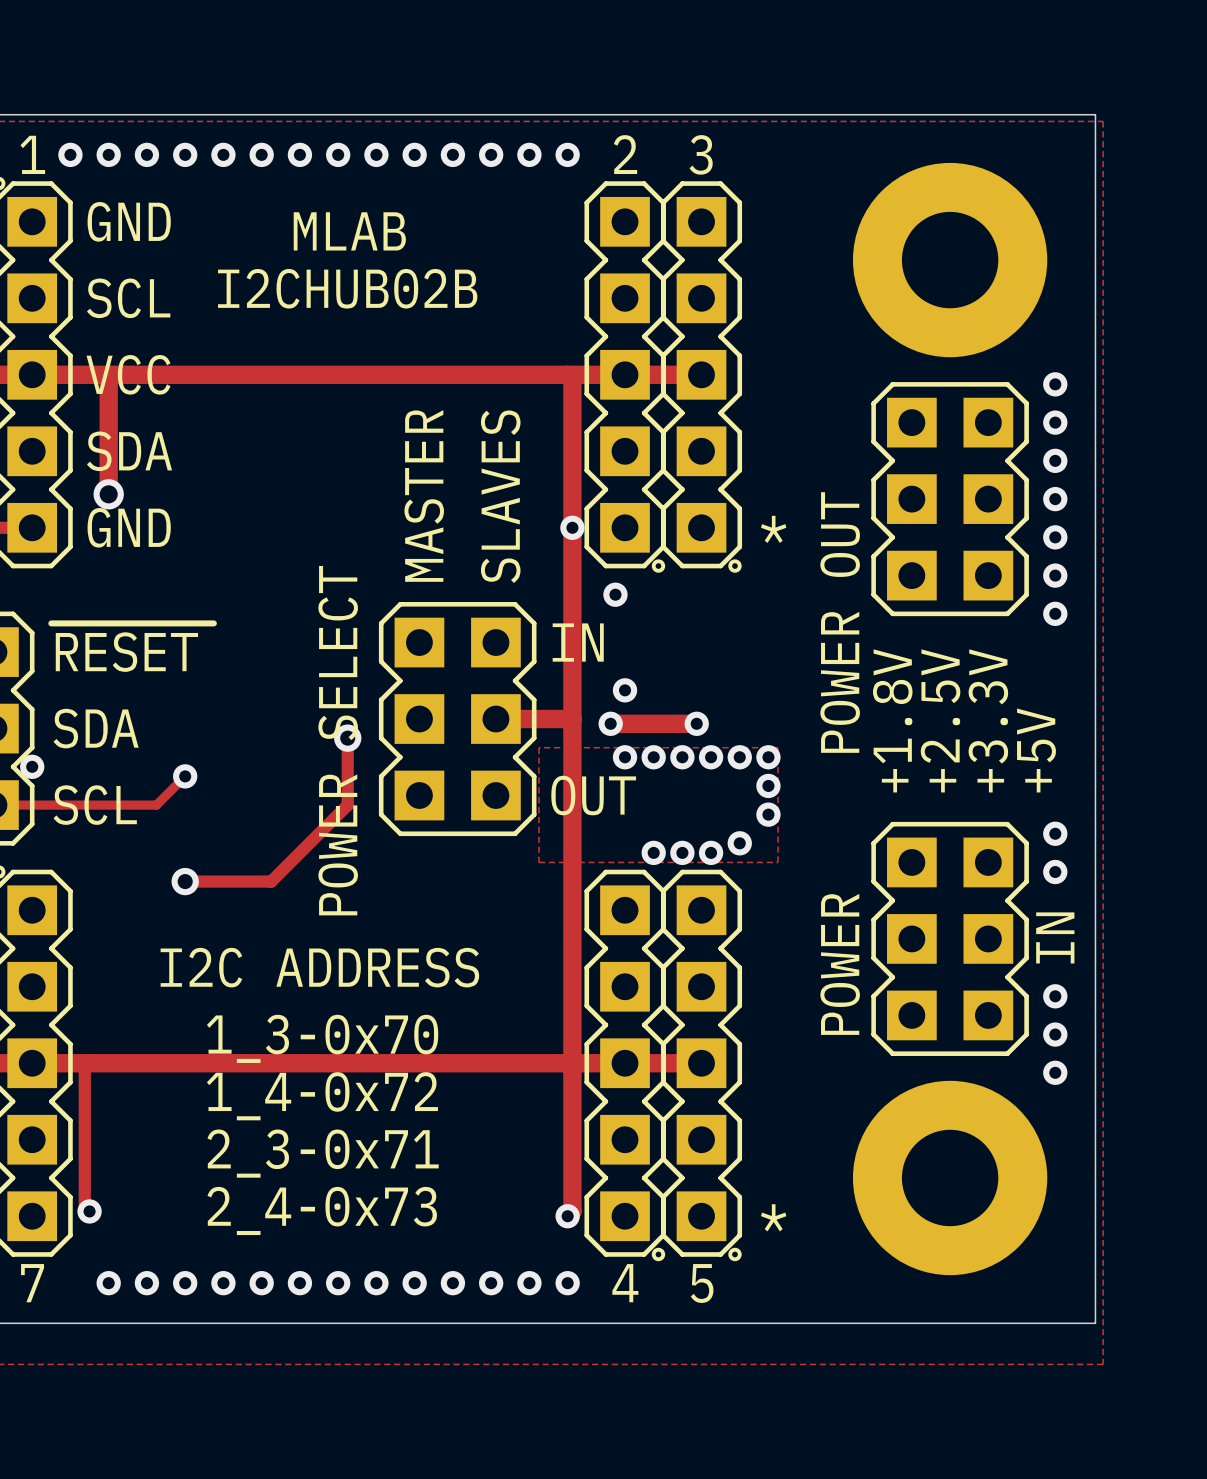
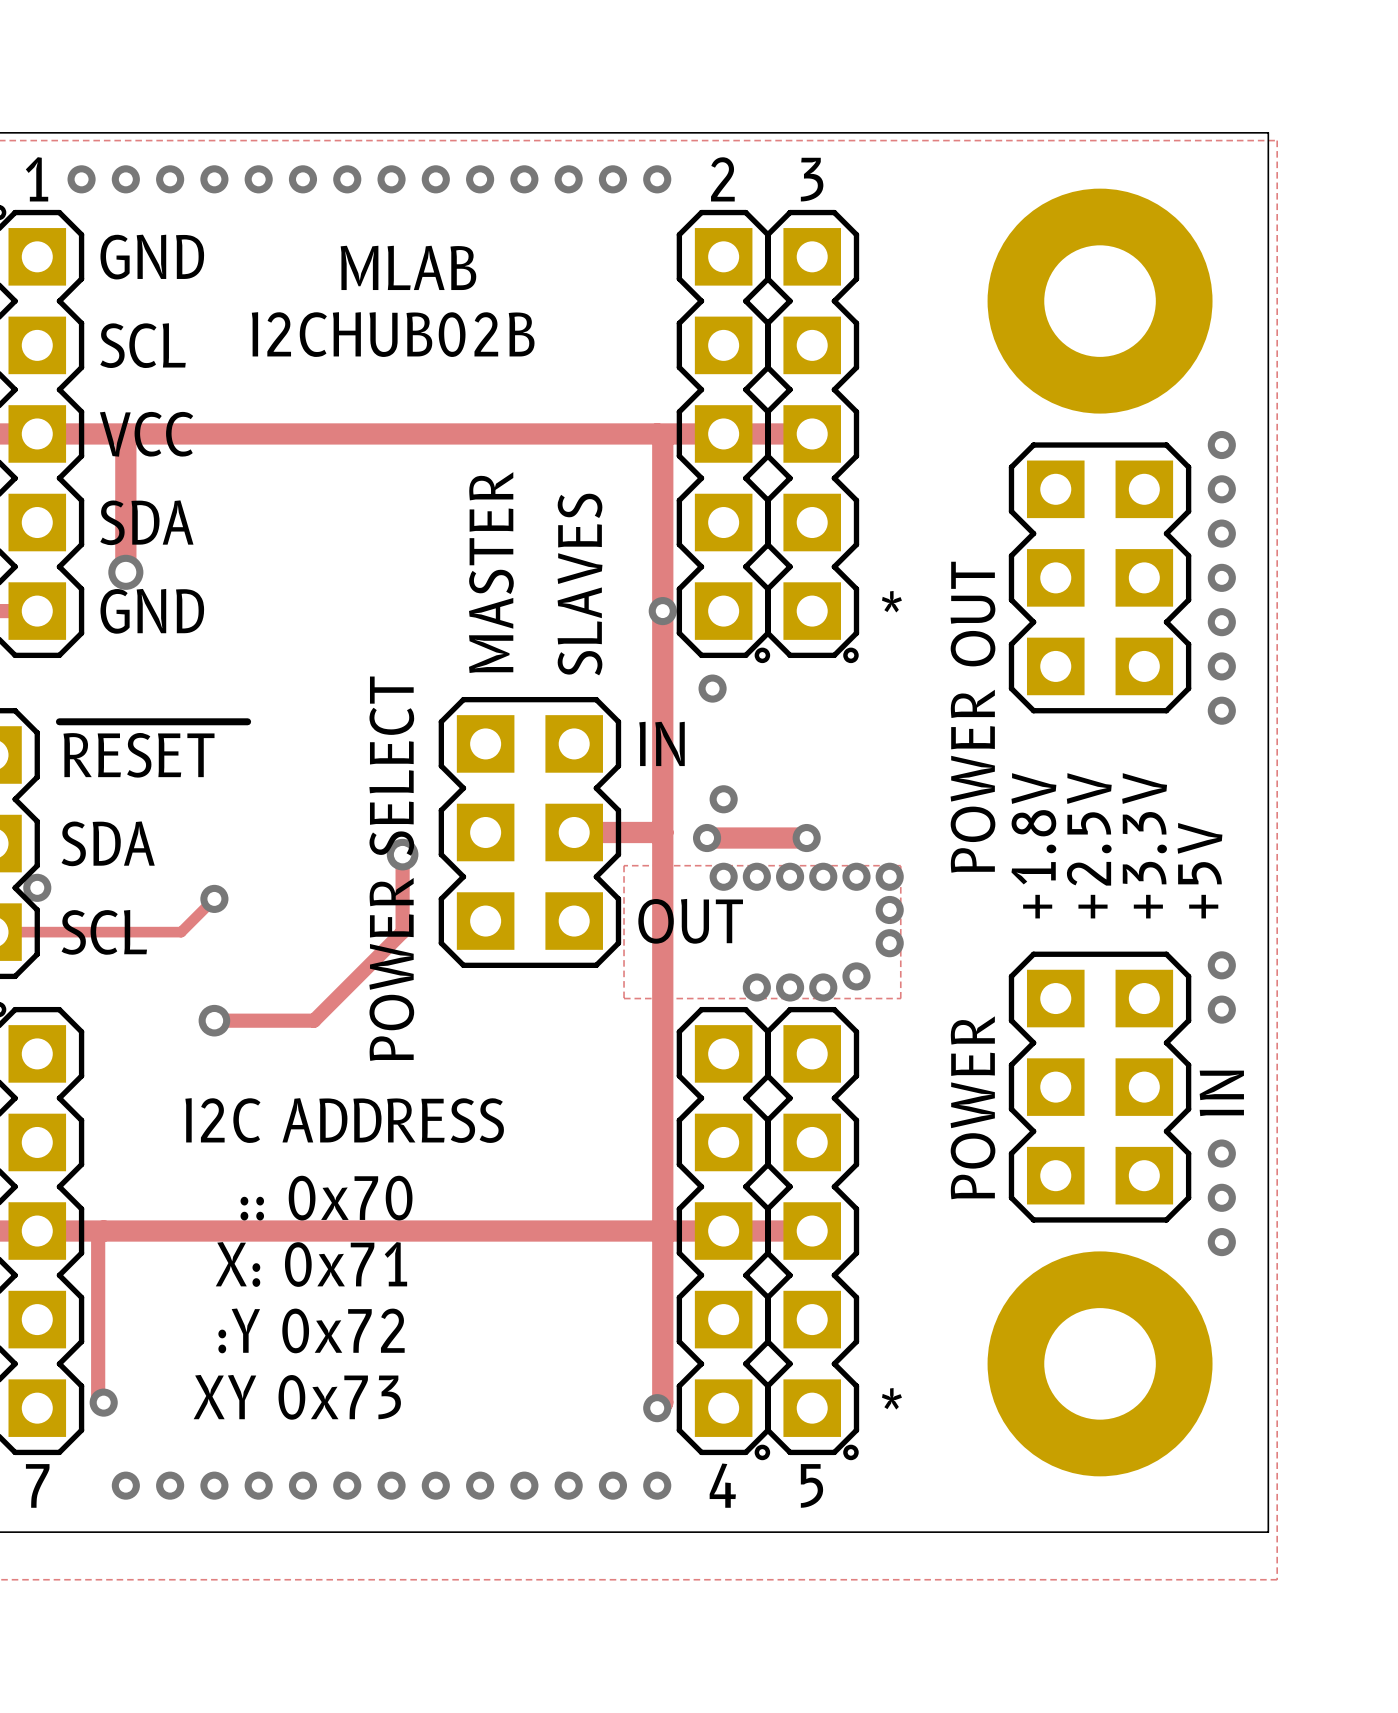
text: 1_3-0x70 (322, 1038) -> :: 0x70 (326, 1198)
text: 1_4-0x72 (322, 1096) -> X: 0x71 (311, 1264)
text: 2_3-0x71 (323, 1153) -> :Y 0x72 (311, 1330)
text: none -> XY 0x73 (297, 1397)
text: 2_4-0x73 (322, 1210) -> none

